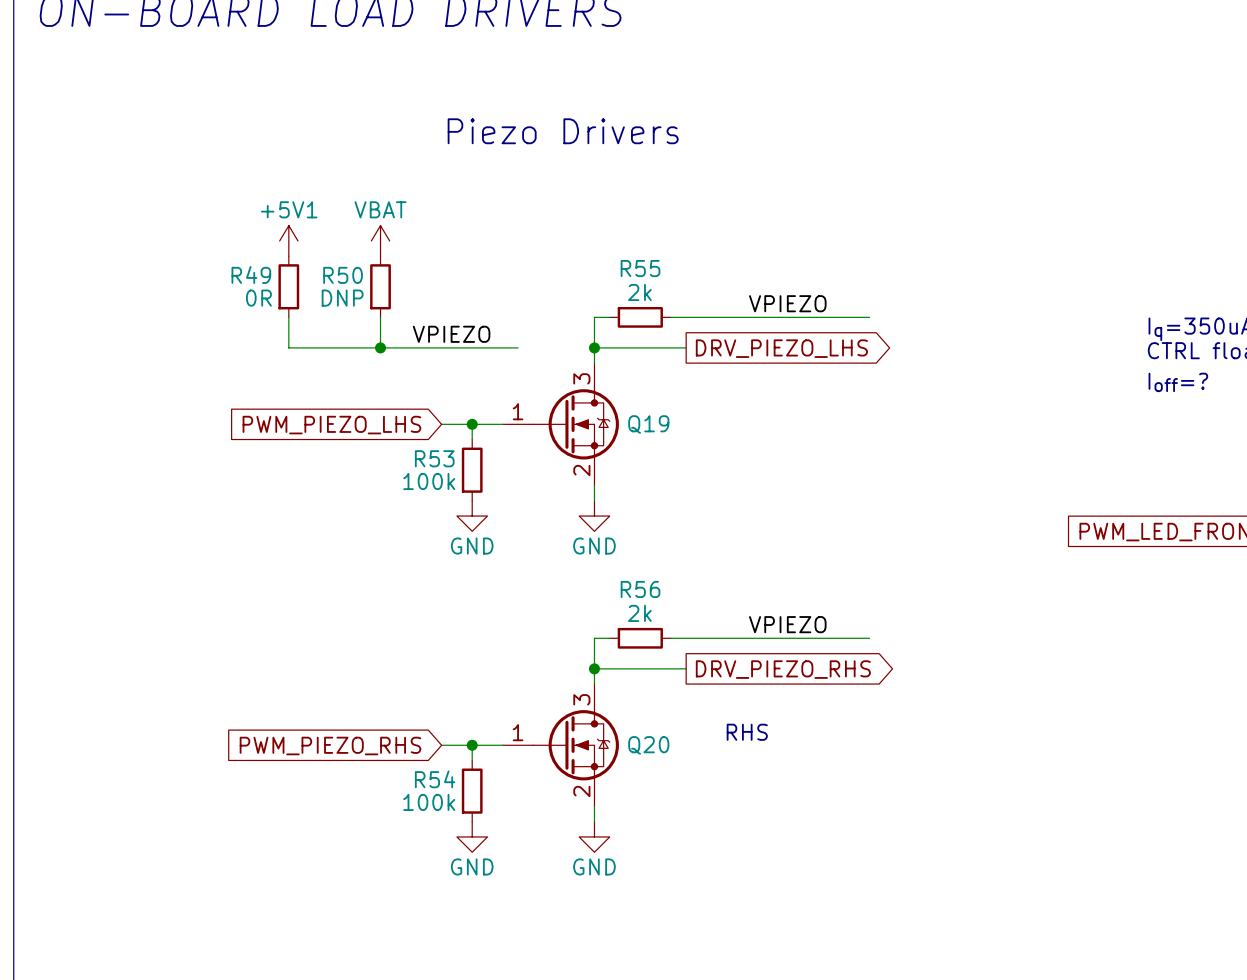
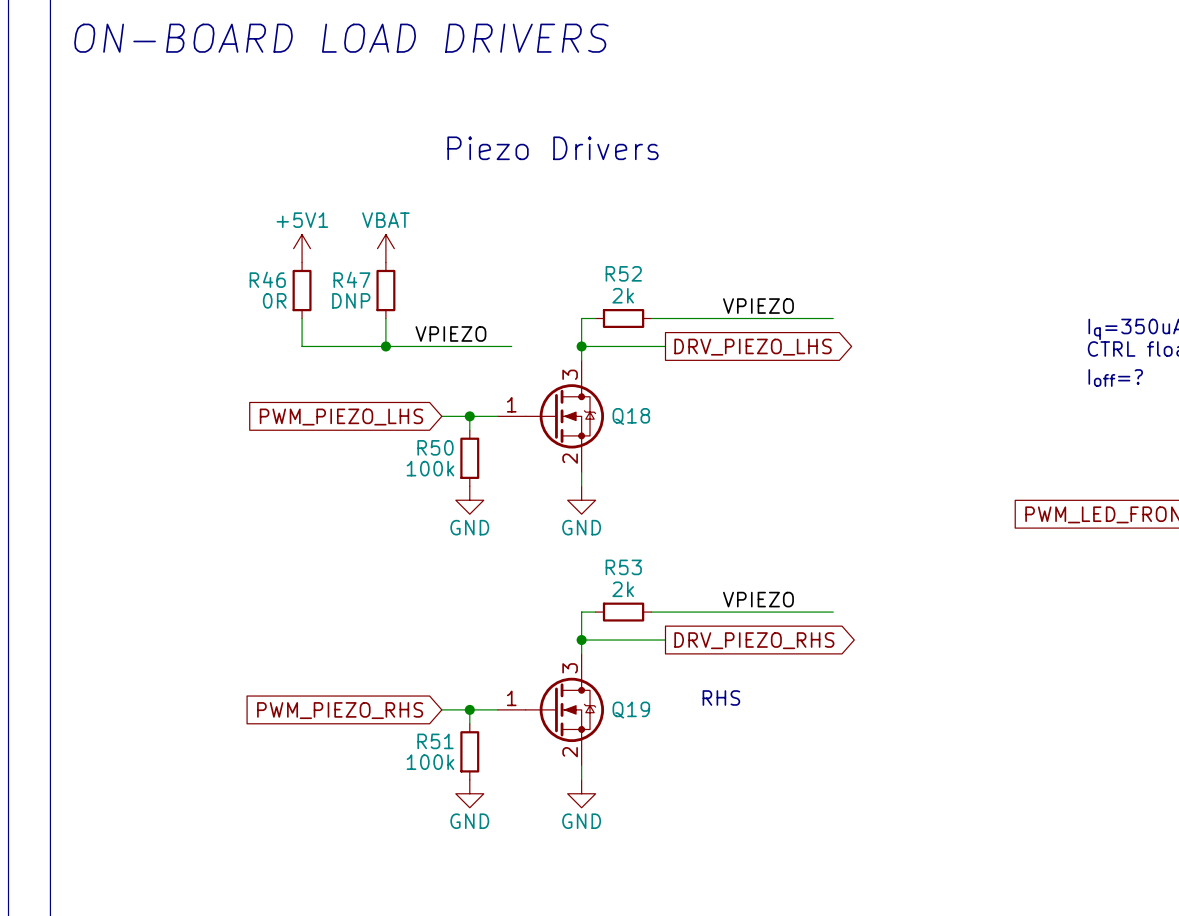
R55 name: R55 (640, 268) -> R52 (623, 273)
R49 name: R49 (251, 275) -> R46 (267, 279)
R50 name: R50 (343, 275) -> R47 (351, 279)
Q19 name: Q19 (648, 424) -> Q18 (631, 416)
R53 name: R53 (434, 458) -> R50 (435, 447)
R56 name: R56 (640, 589) -> R53 (623, 567)
Q20 name: Q20 (648, 745) -> Q19 (631, 710)
R54 name: R54 (435, 779) -> R51 (435, 741)

